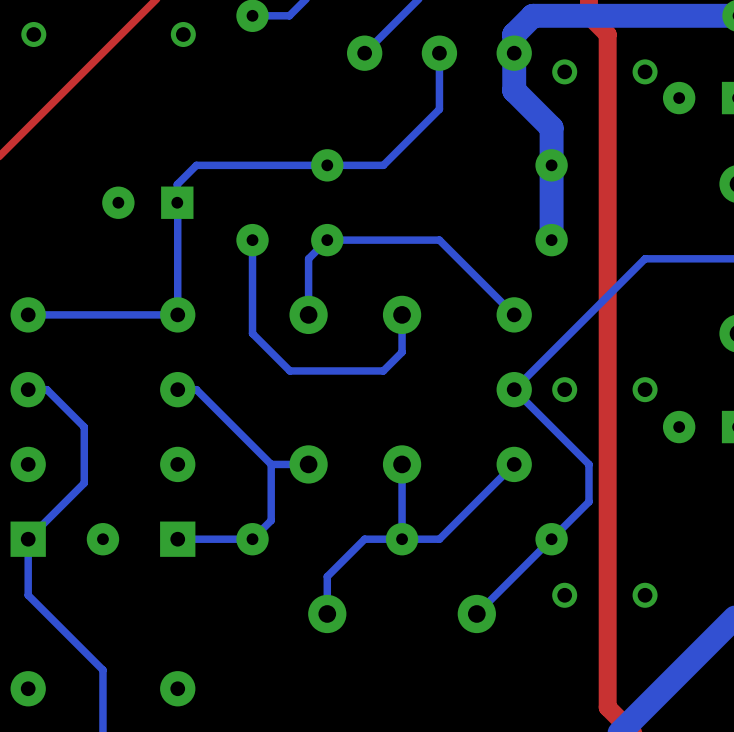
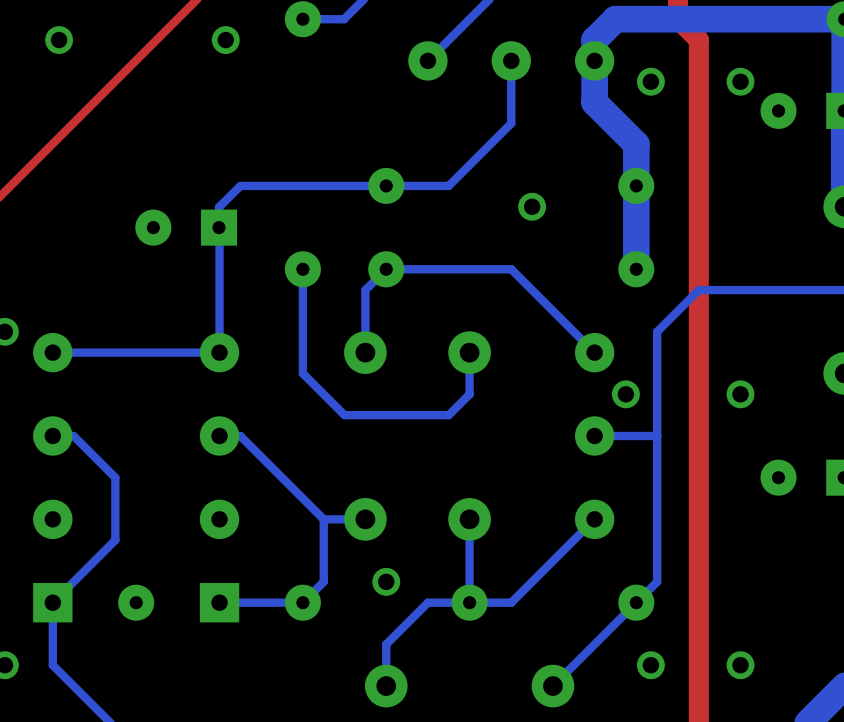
via: none -> (532, 206)
bottom track: (645, 258) (514, 389) (588, 464) (588, 501) (570, 520) -> (740, 290) (698, 290) (657, 331) (657, 581)
via position: (564, 389) -> (625, 394)
bottom track: none -> (657, 435) (594, 435)
via position: (645, 389) -> (740, 394)
via: none -> (386, 581)

